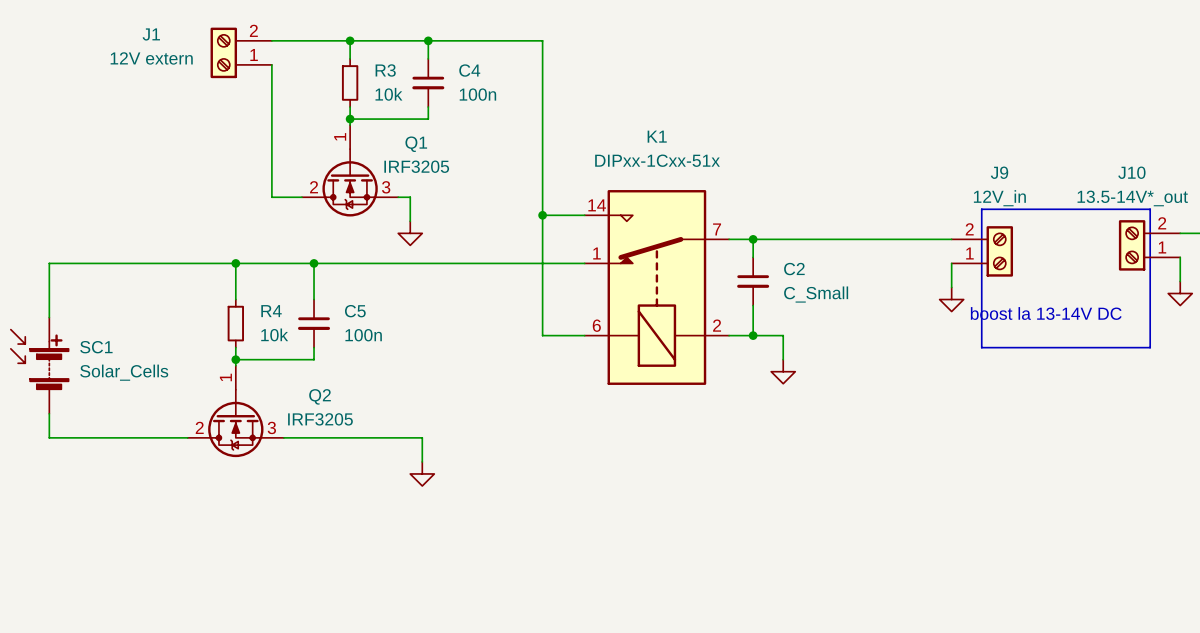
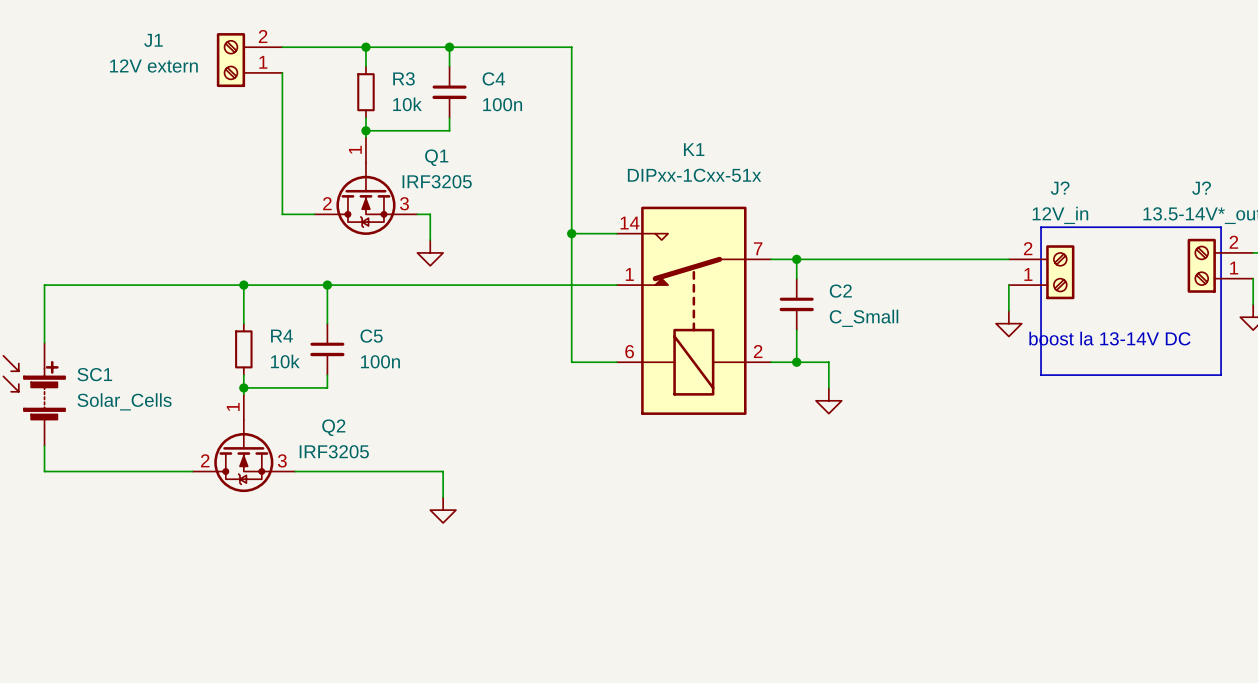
J9 name: J9 (999, 172) -> J? (1060, 188)
J10 name: J10 (1131, 172) -> J? (1201, 188)

